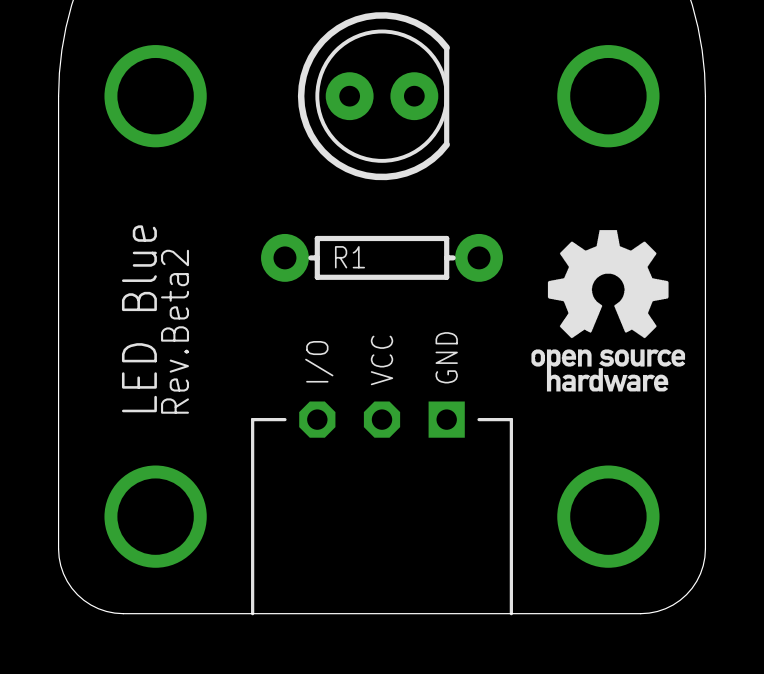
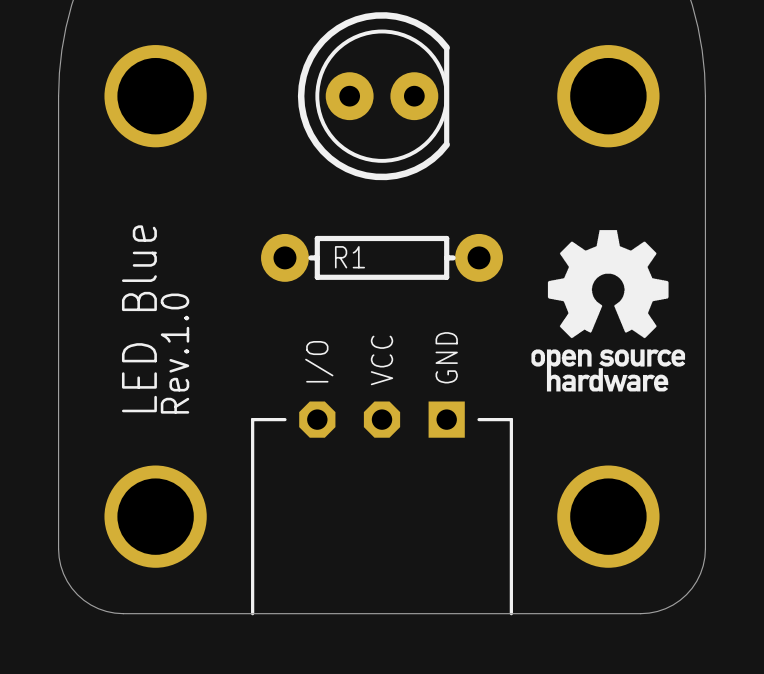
text: Rev.Beta2 (175, 331) -> Rev.1.0 (175, 353)

